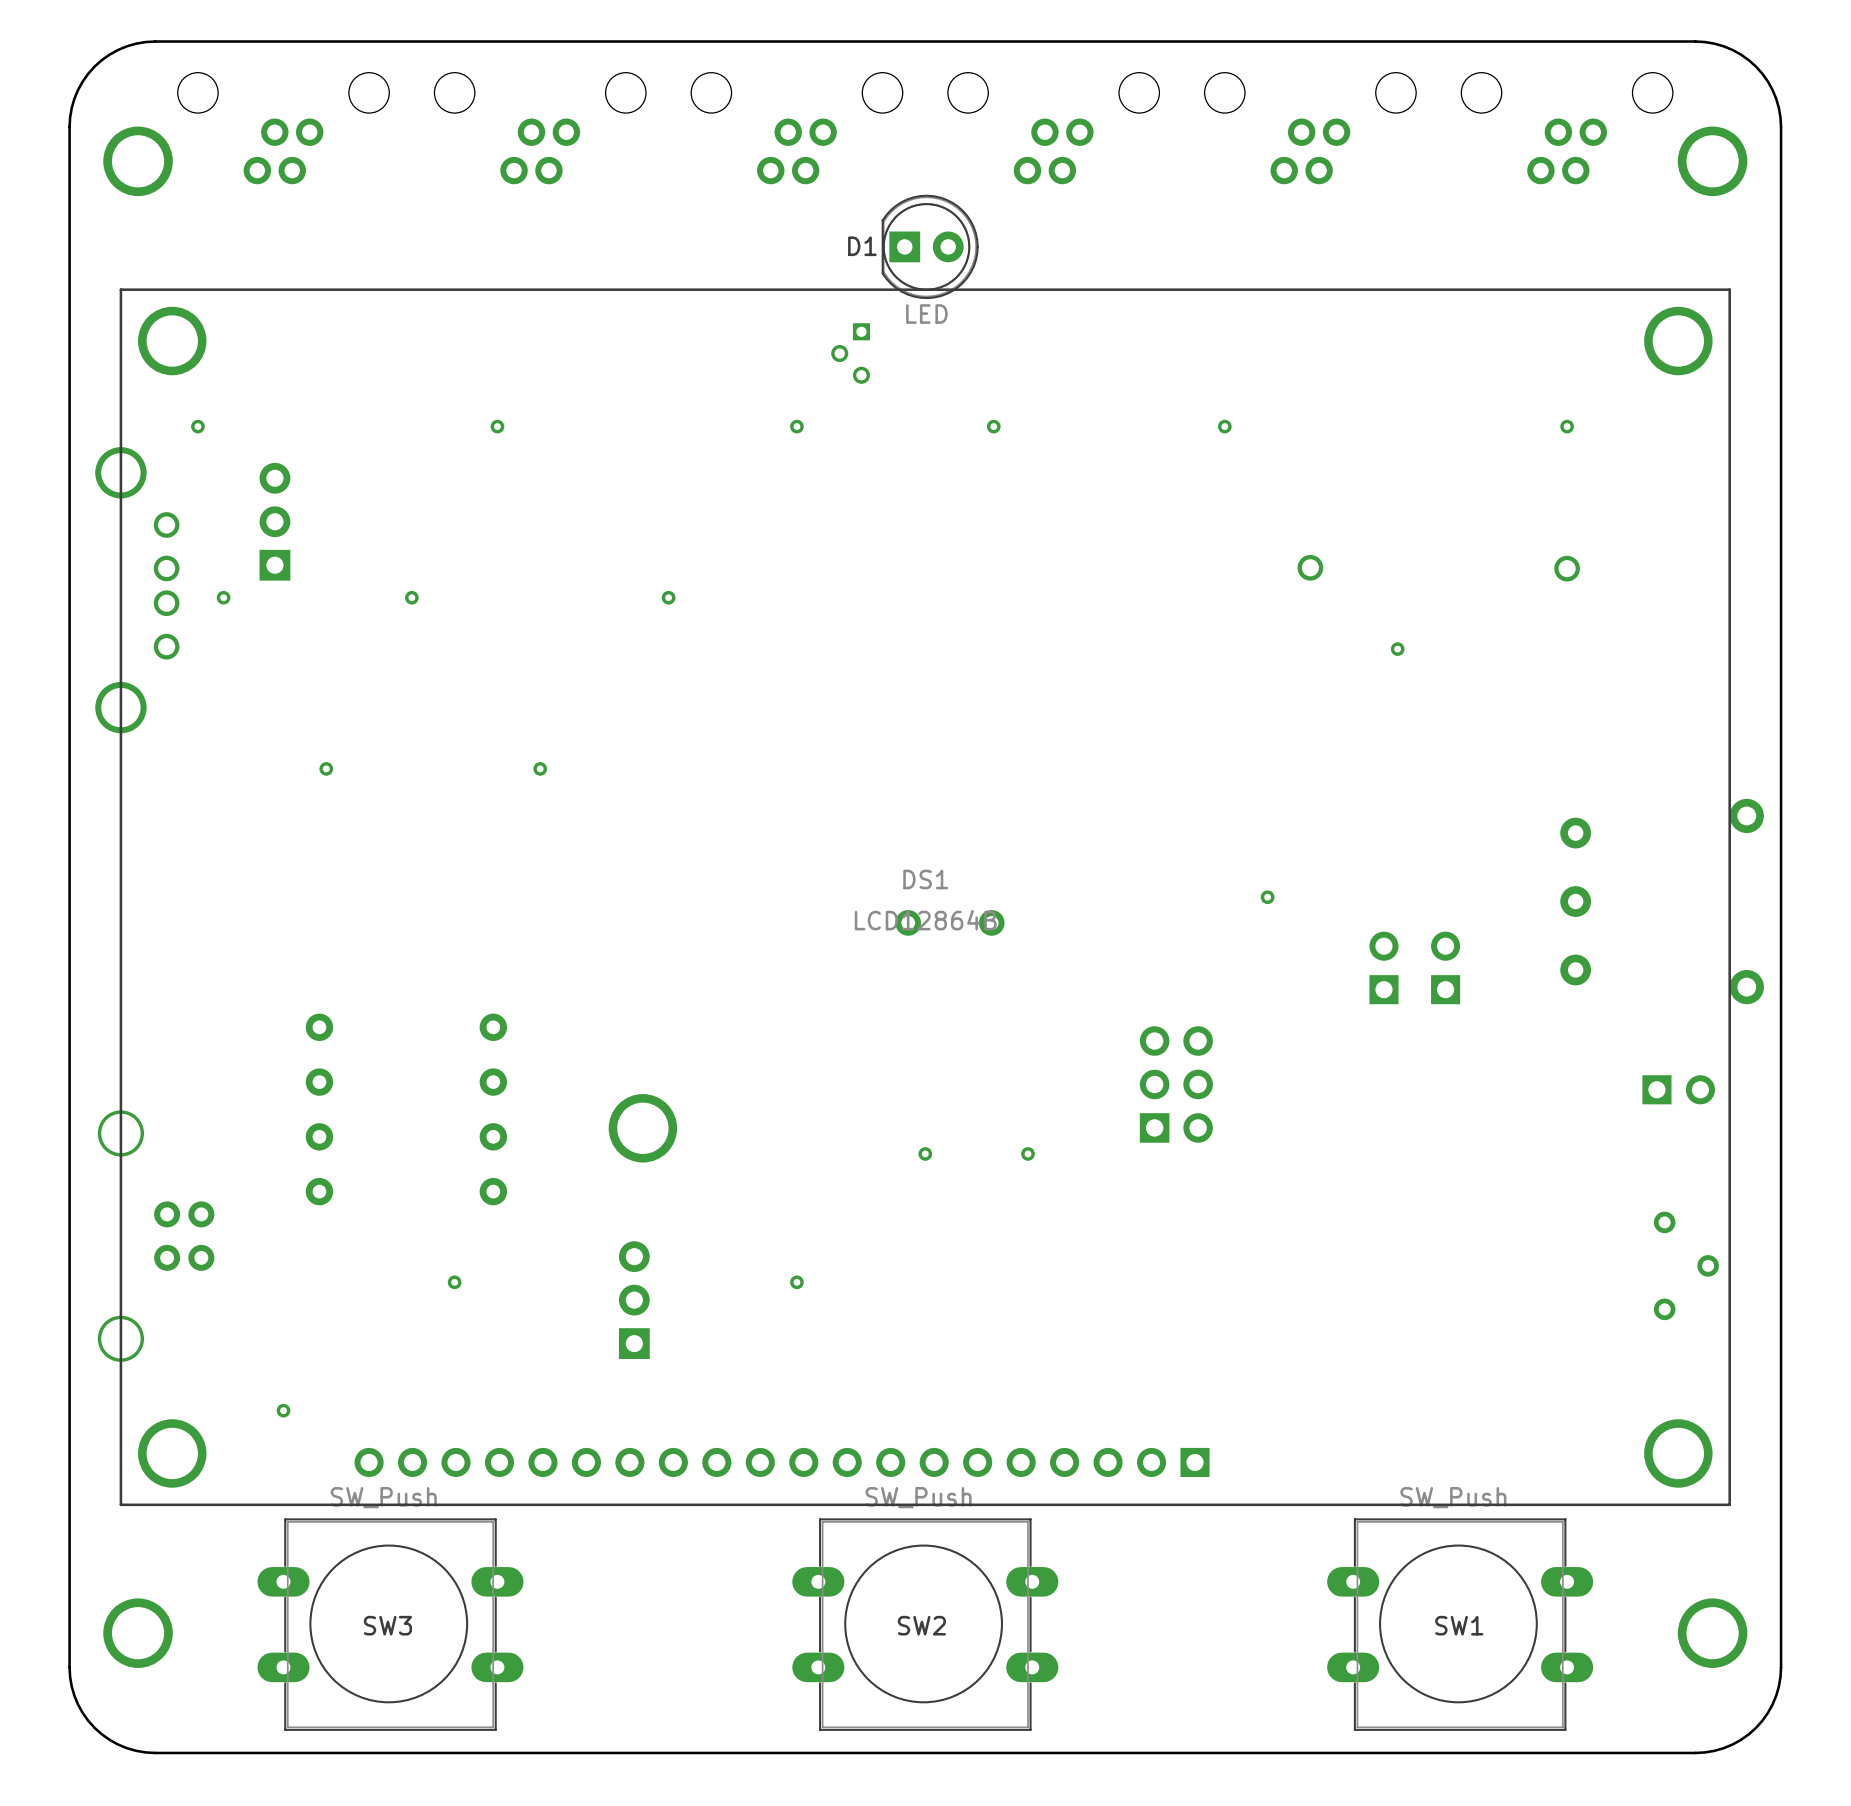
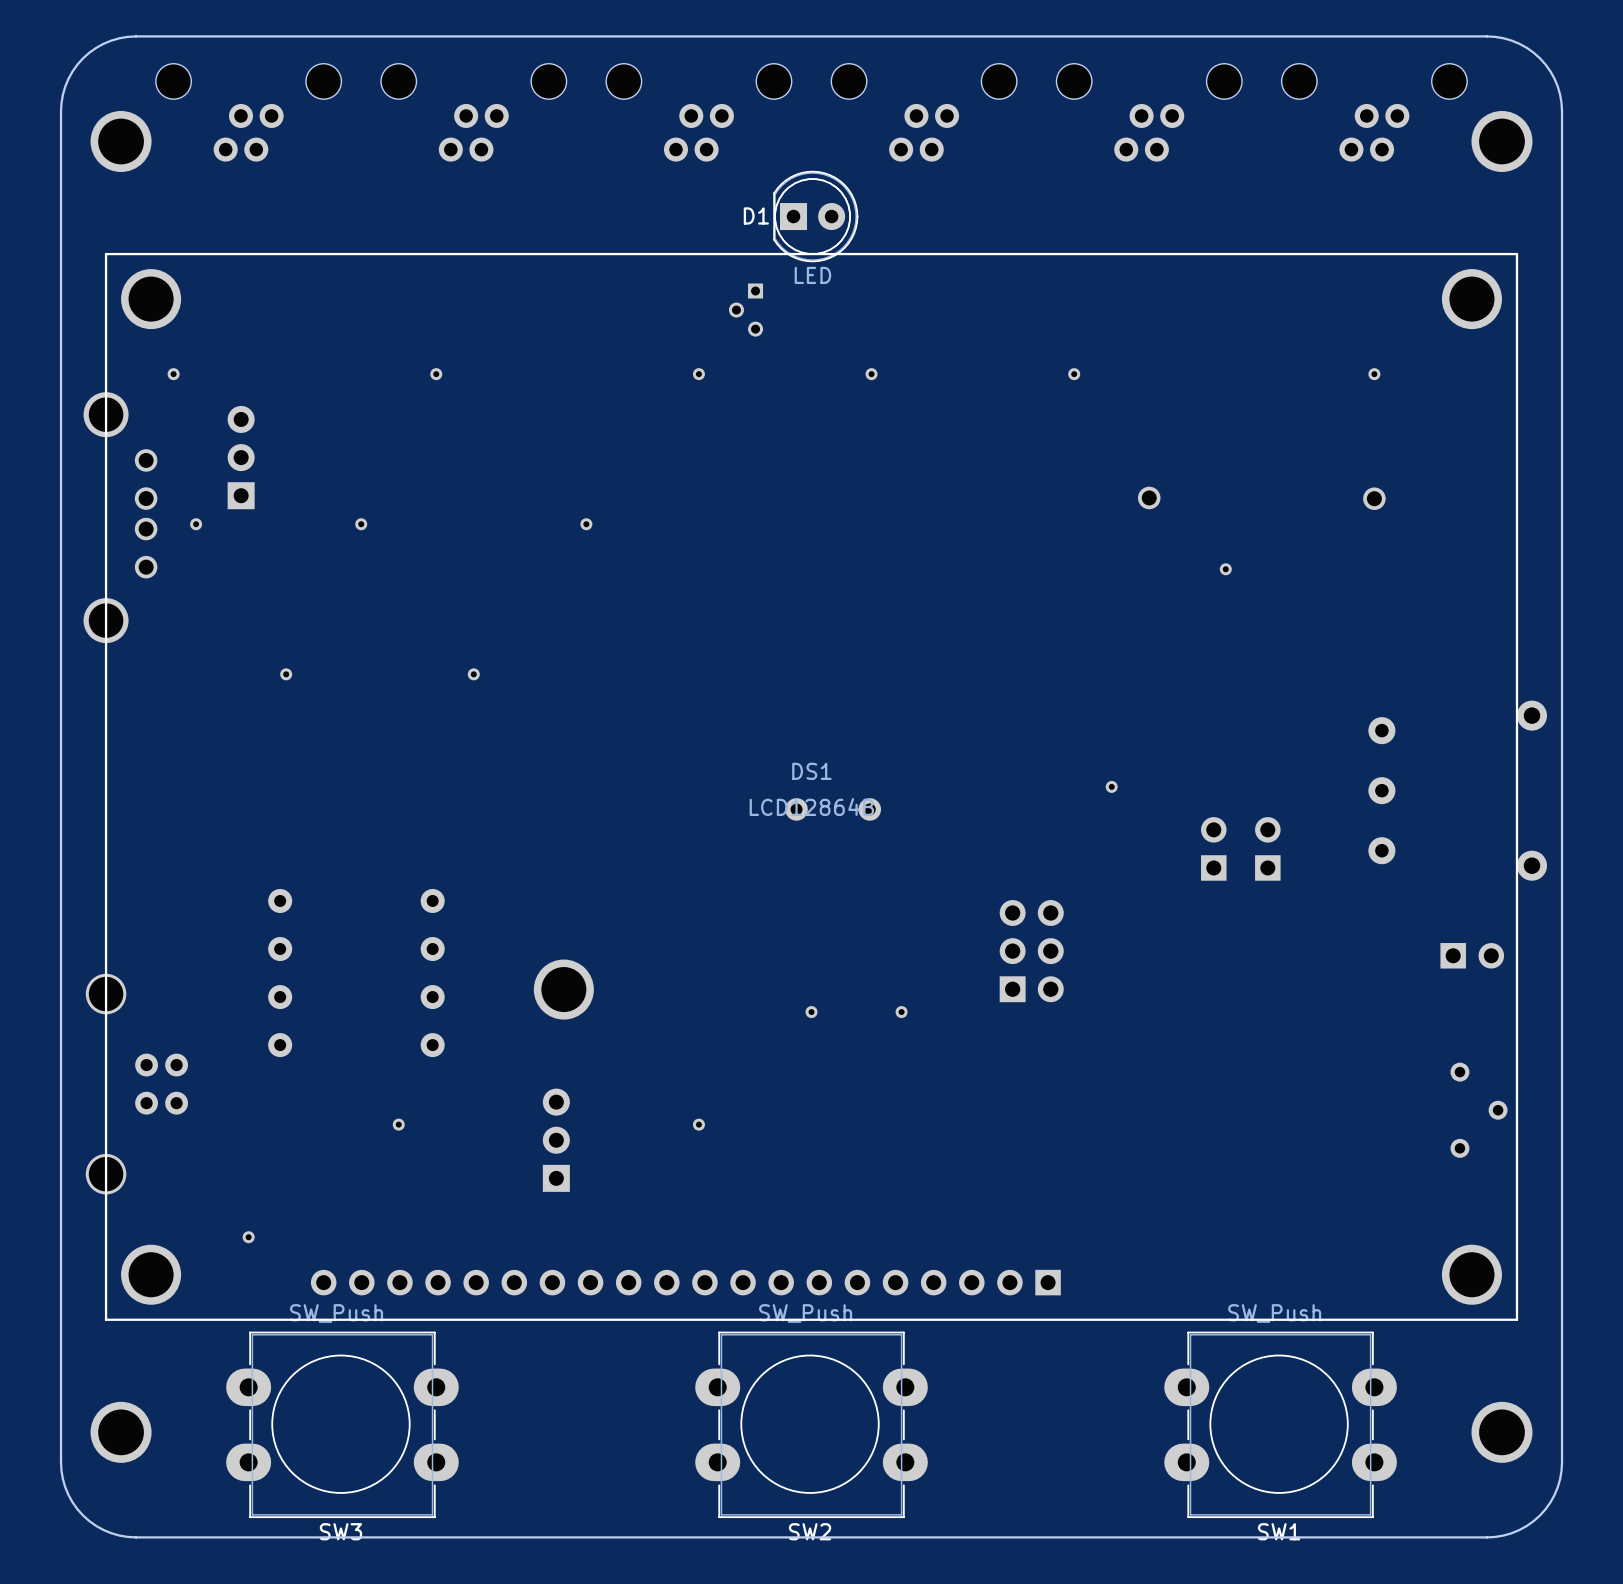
SW3 footprint: [257, 1518, 524, 1731] -> [226, 1331, 459, 1519]
SW2 footprint: [792, 1518, 1059, 1731] -> [695, 1331, 928, 1519]
SW1 footprint: [1327, 1518, 1594, 1731] -> [1164, 1331, 1397, 1519]
SW3 name position: SW3 (387, 1625) -> SW3 (340, 1531)
SW2 name position: SW2 (921, 1625) -> SW2 (810, 1531)
SW1 name position: SW1 (1459, 1625) -> SW1 (1279, 1531)

